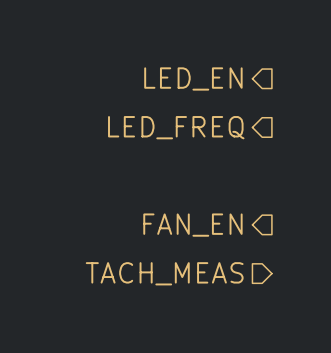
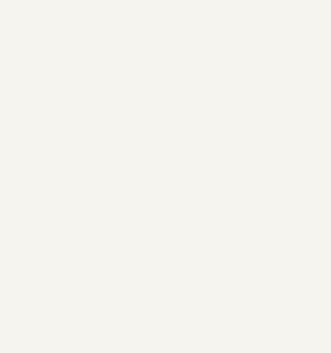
hierarchical label: LED_EN (193, 78) -> none
hierarchical label: LED_FREQ (176, 127) -> none
hierarchical label: FAN_EN (192, 225) -> none
hierarchical label: TACH_MEAS (164, 273) -> none

